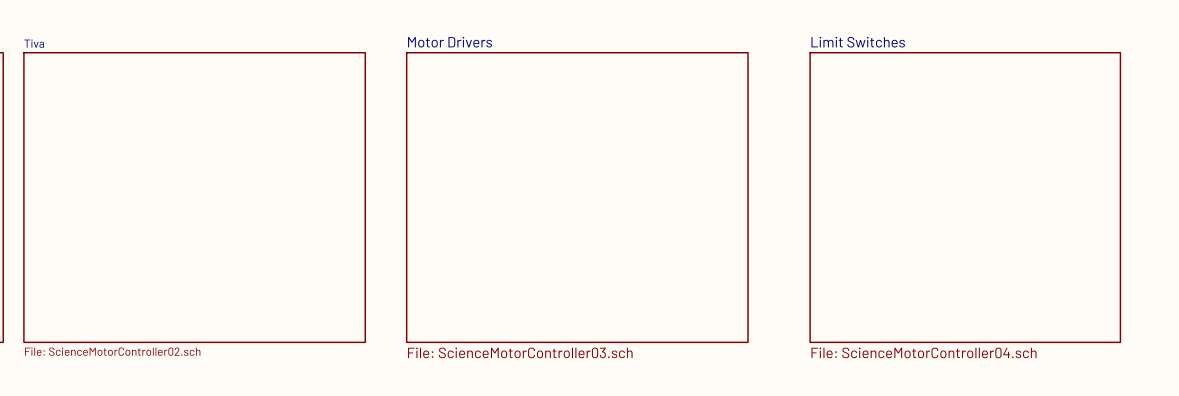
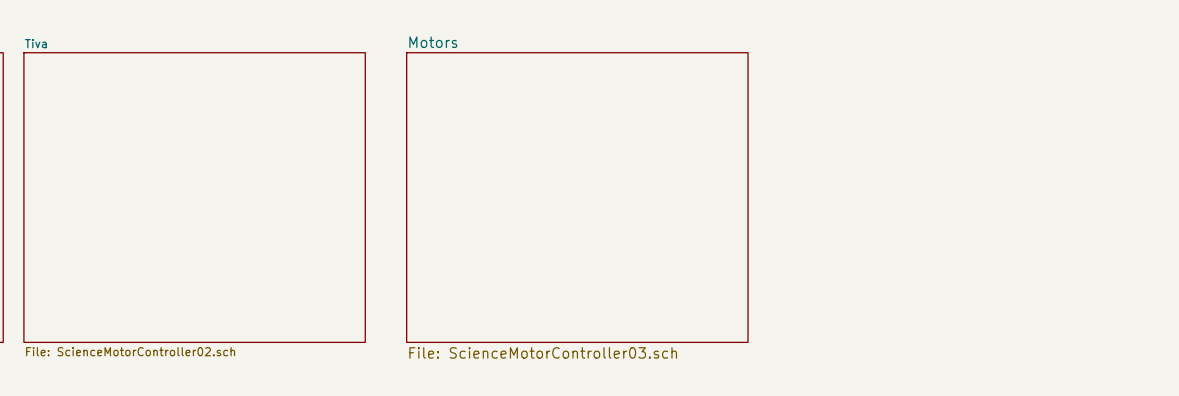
sheet Motor Drivers name: Motor Drivers (450, 42) -> Motors (433, 42)
sheet Limit Switches: File: ScienceMotorController04.sch (965, 197) -> none

